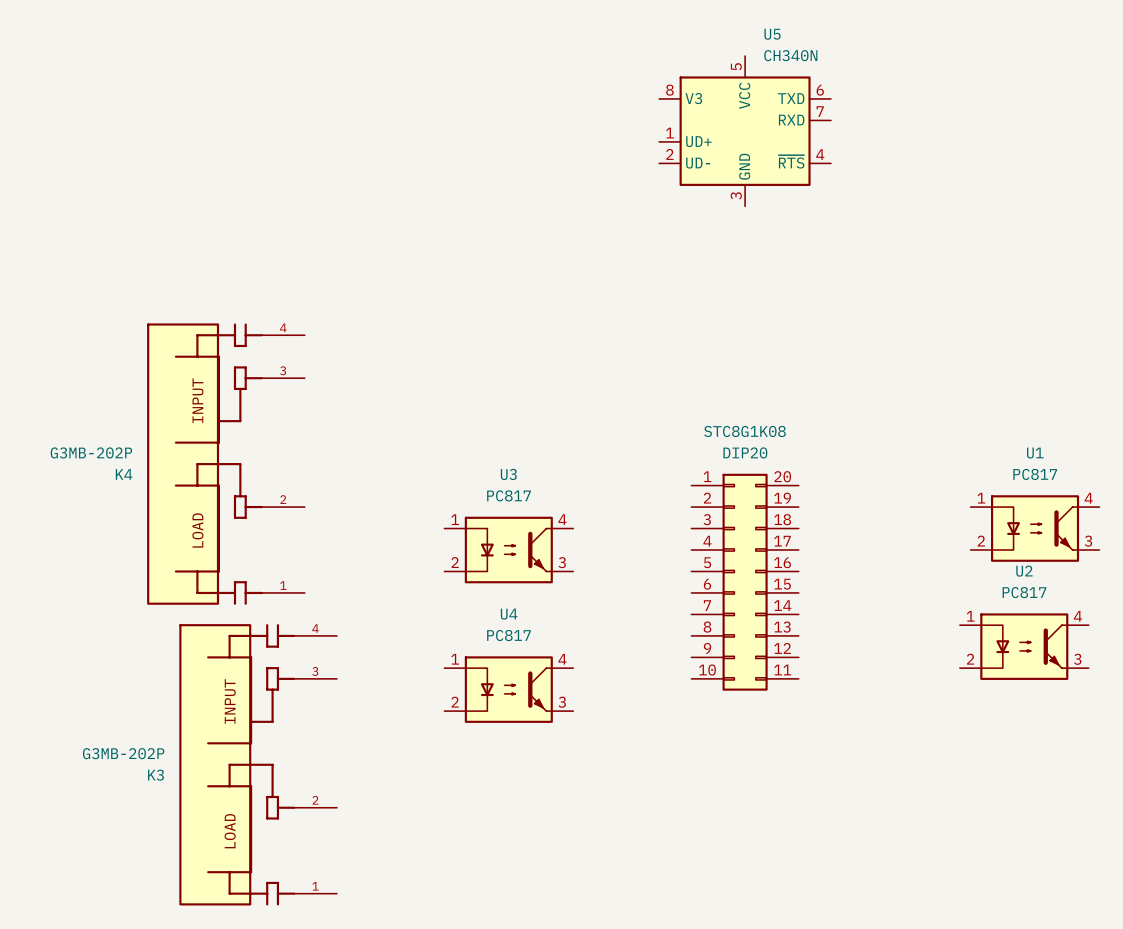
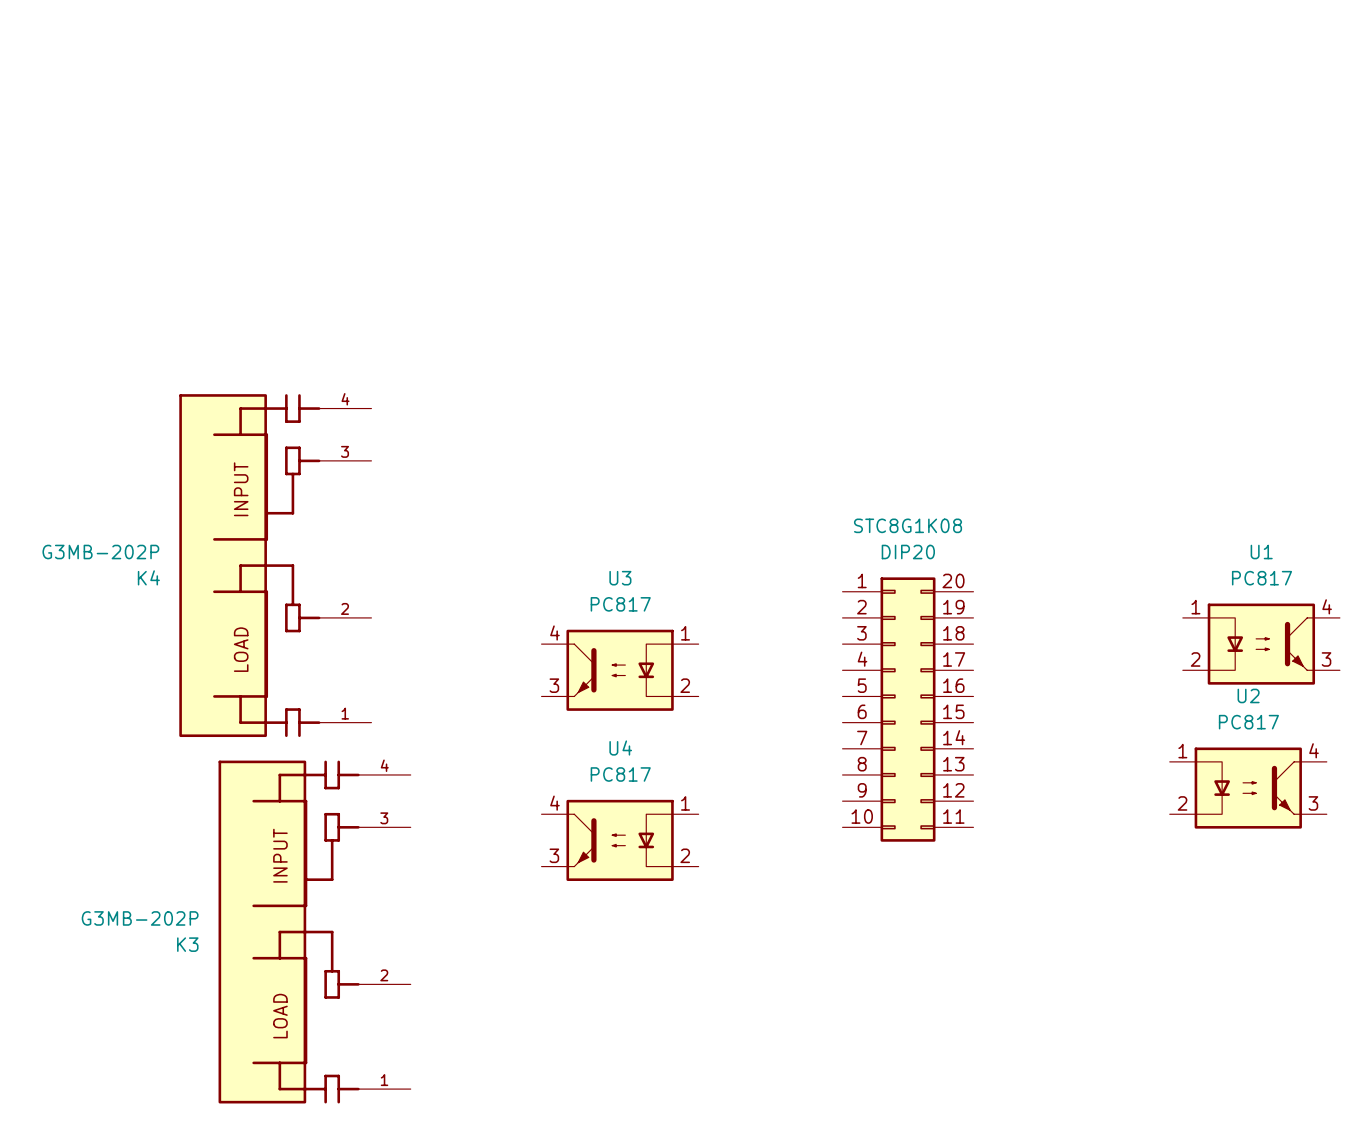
U5: CH340N (745, 131) -> none
U3 flip: as is (508, 550) -> left-right (620, 670)
U4 flip: as is (508, 689) -> left-right (620, 840)

